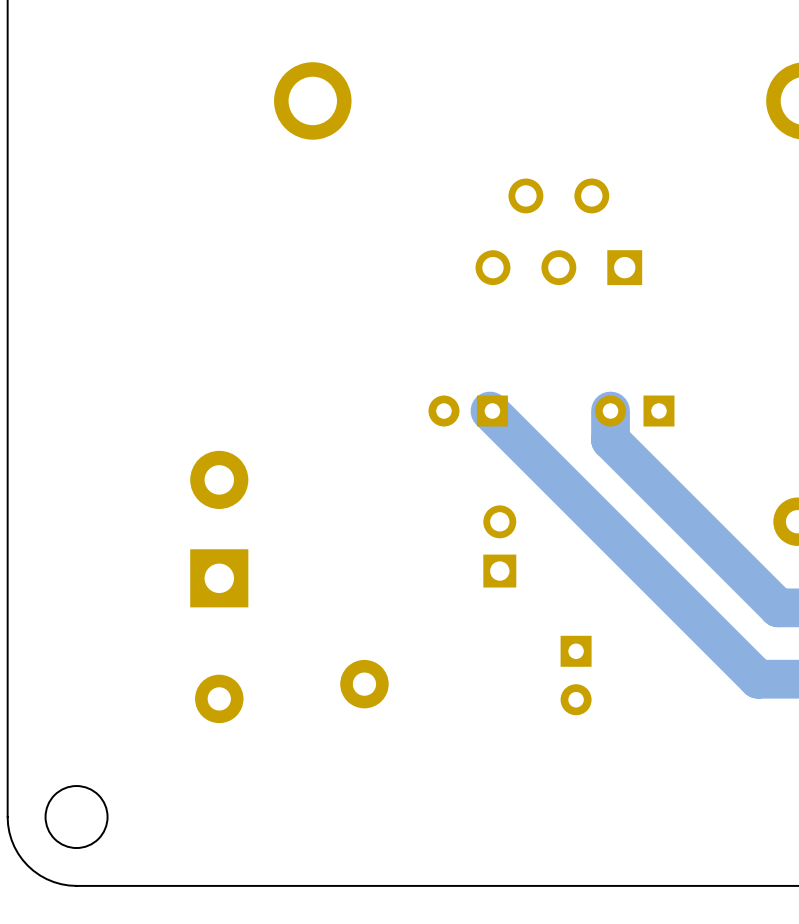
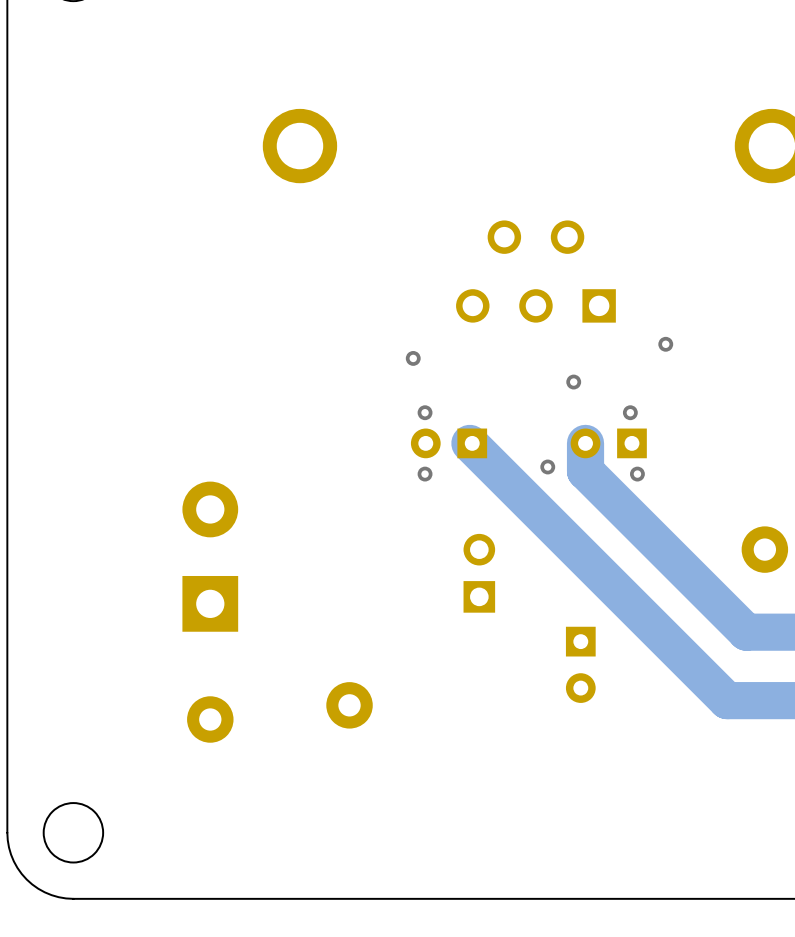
via: none -> (665, 344)
via: none -> (413, 358)
via: none -> (573, 382)
via: none -> (425, 412)
via: none -> (630, 412)
via: none -> (547, 466)
via: none -> (425, 474)
via: none -> (637, 474)
part position: (576, 675) -> (580, 664)

